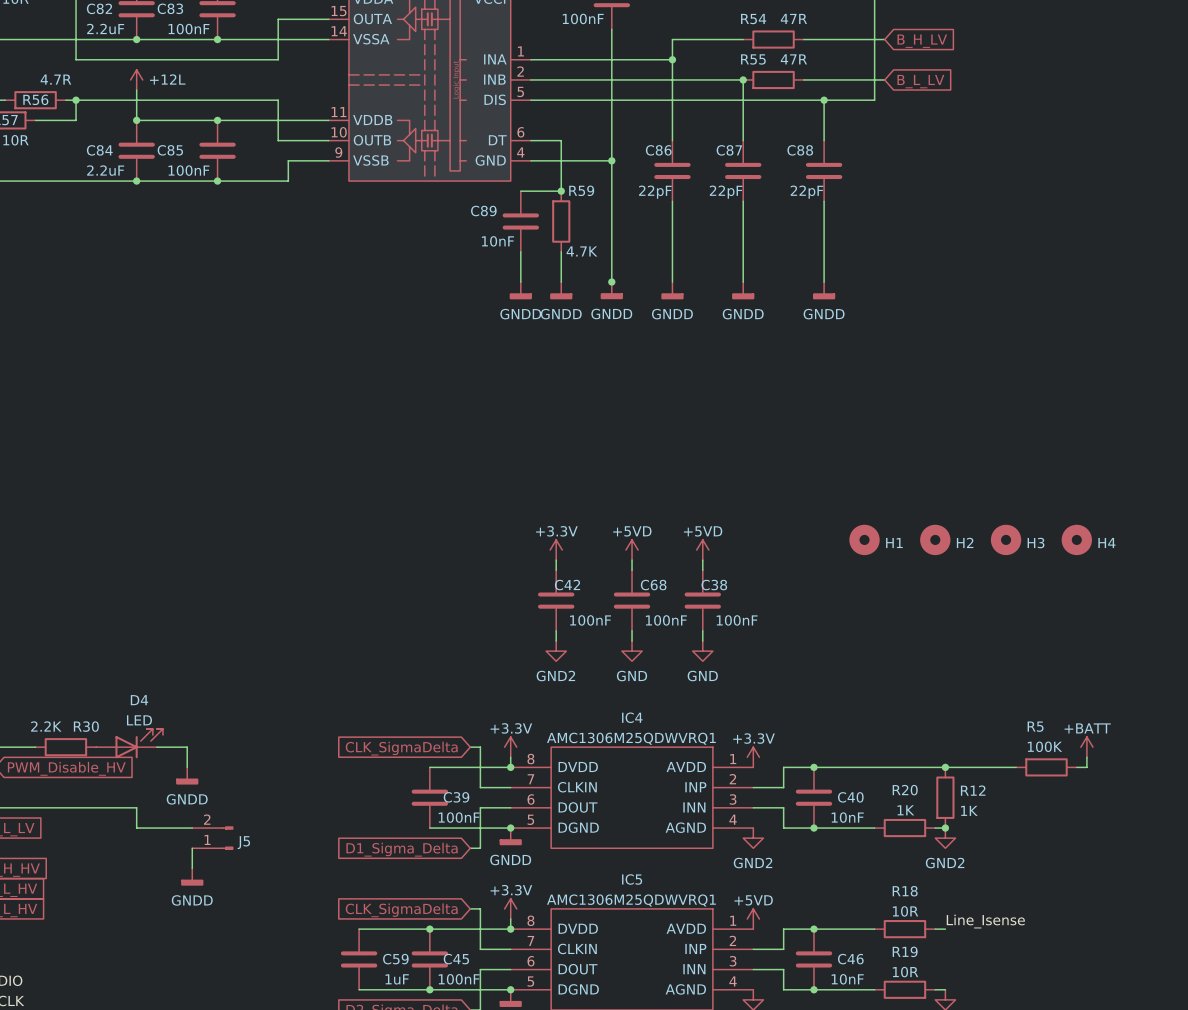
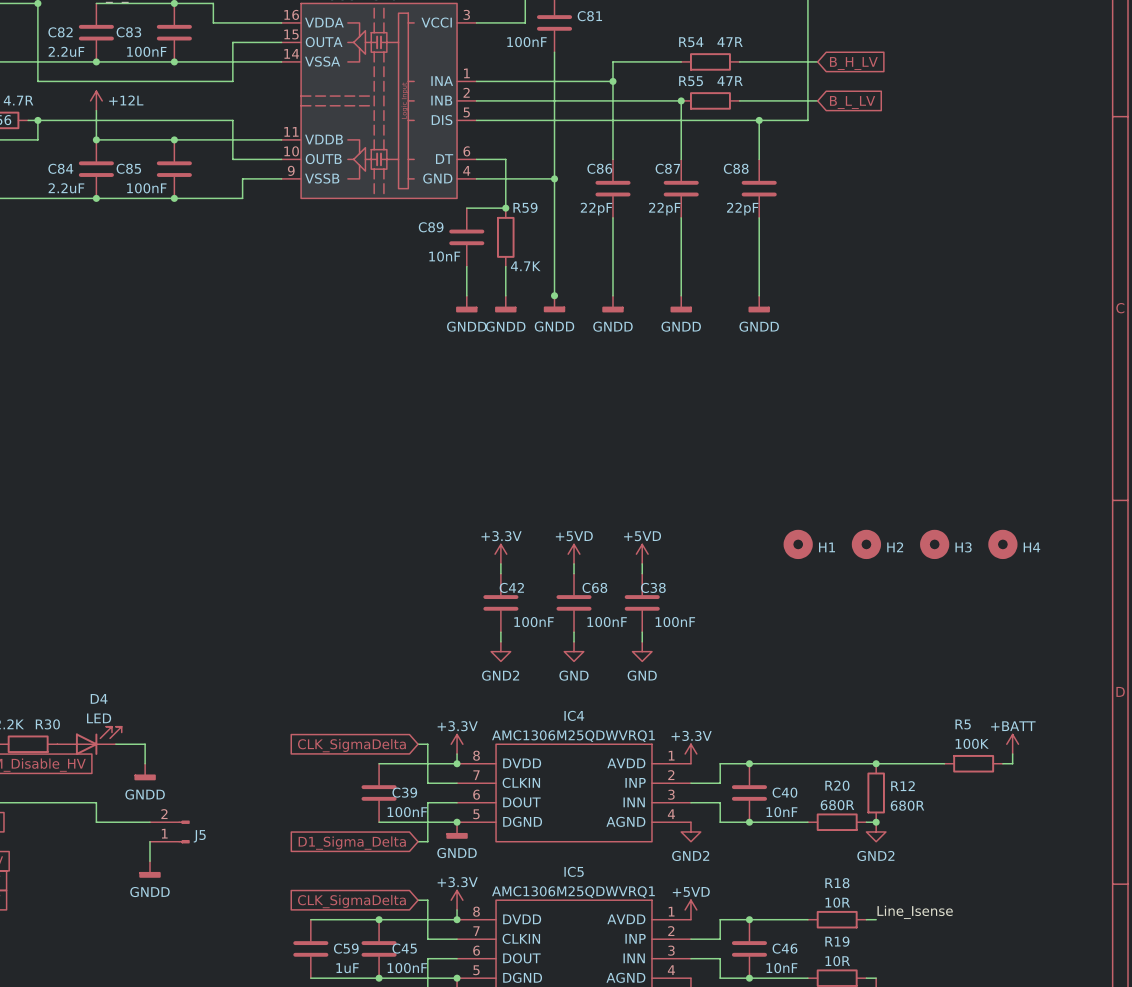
R20 value: 1K (905, 810) -> 680R (837, 805)
R12 value: 1K (969, 810) -> 680R (907, 805)

